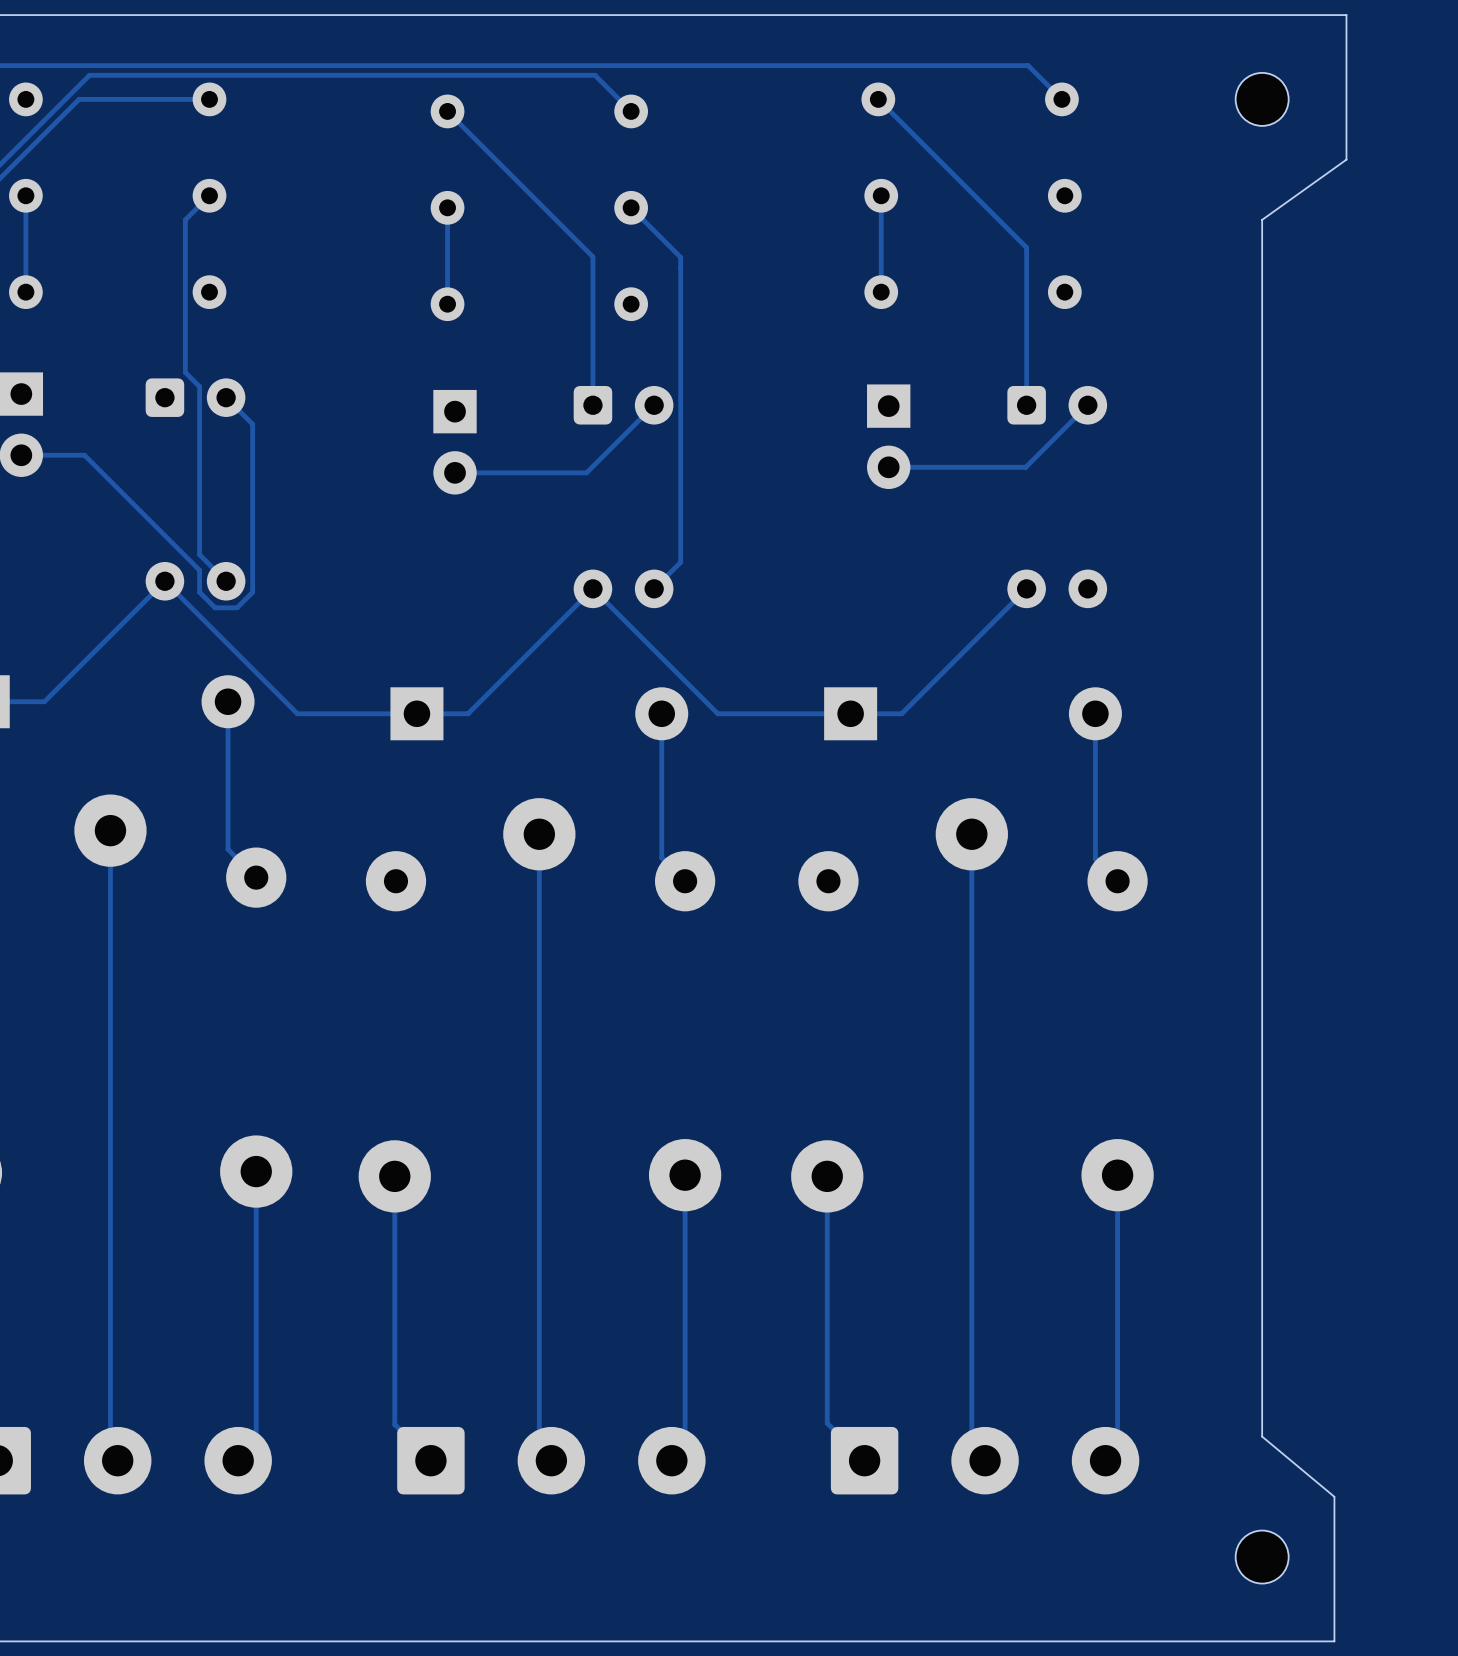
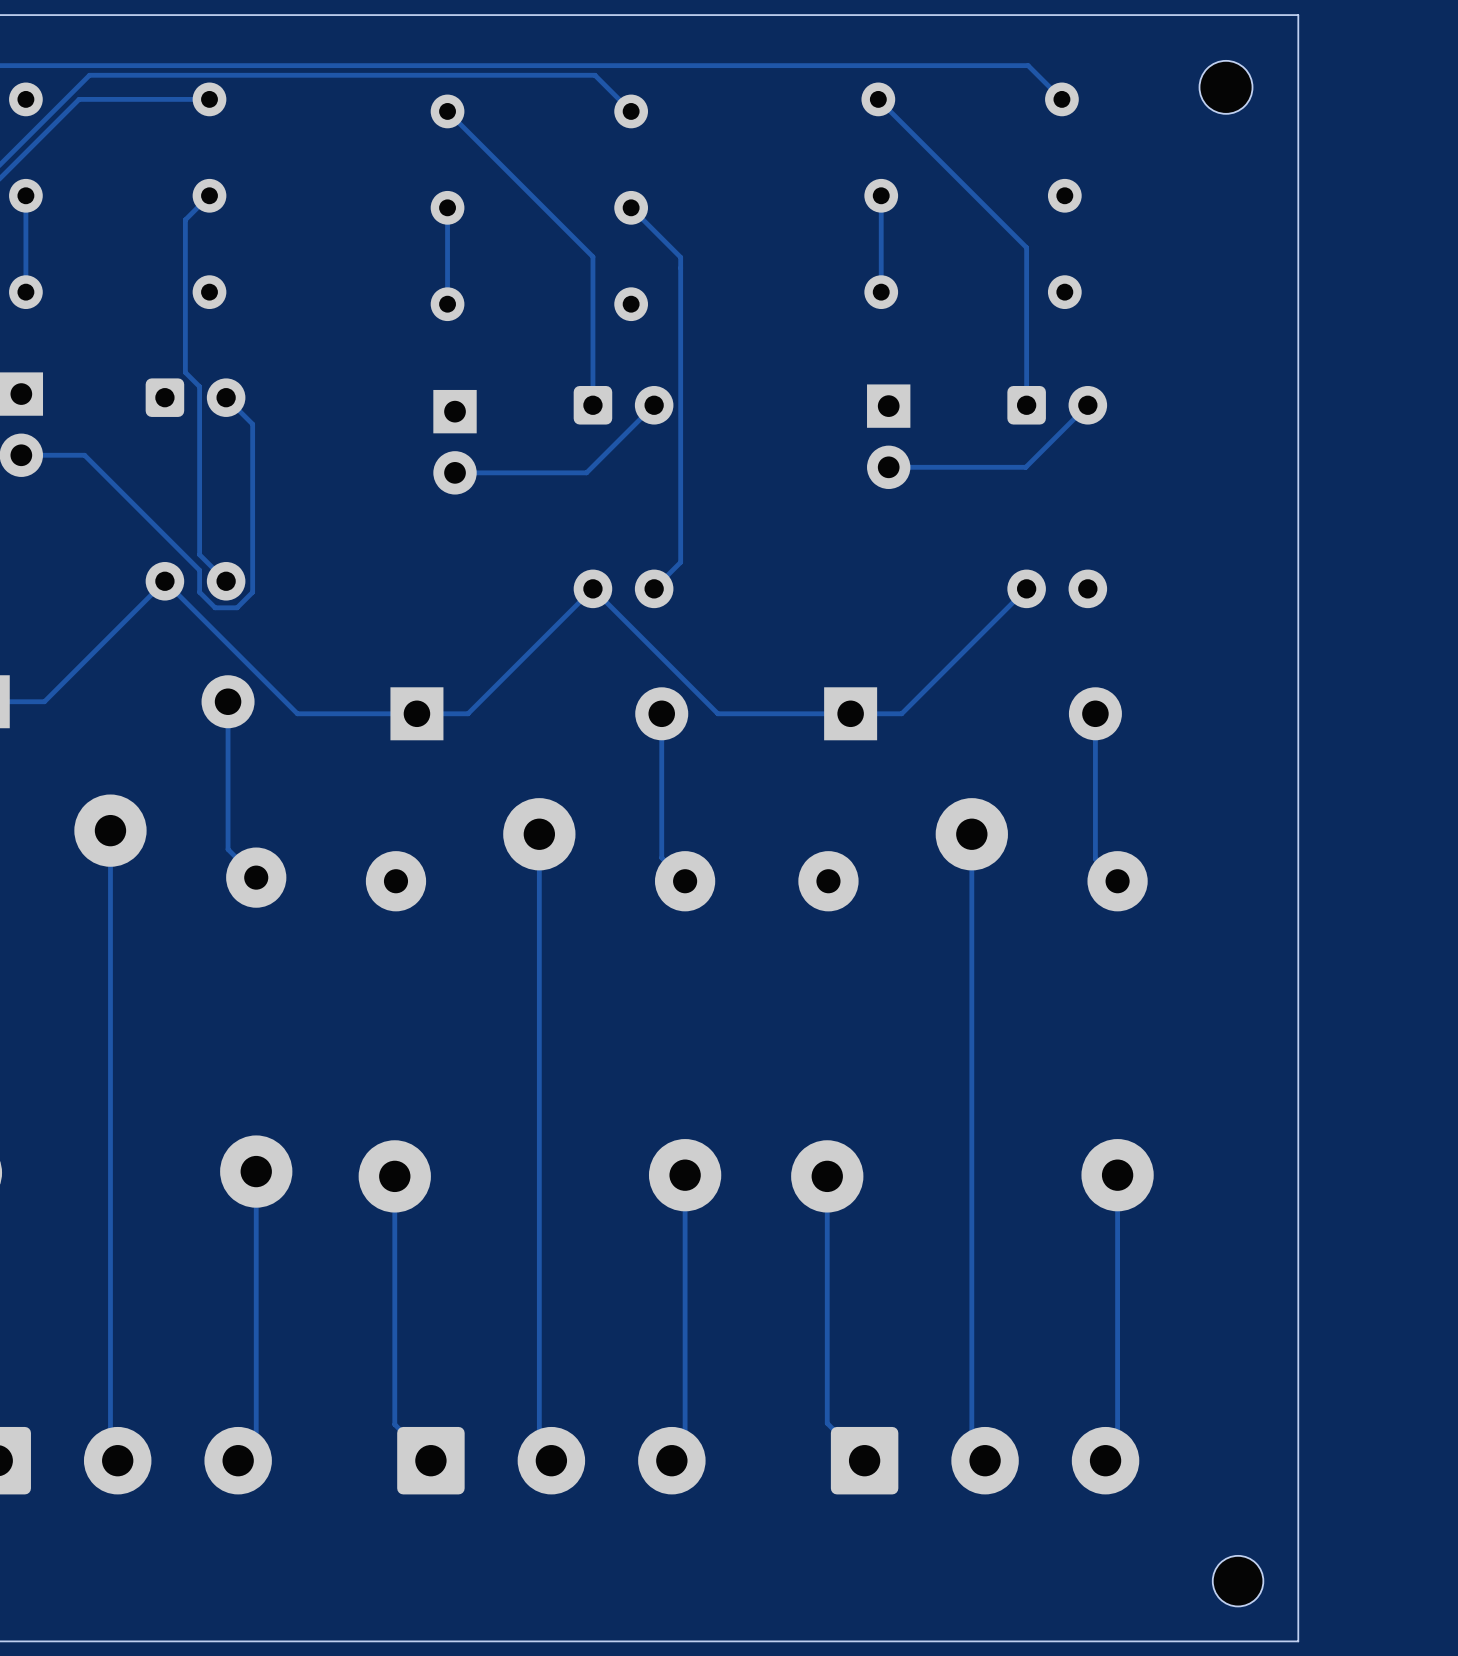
board edge: (1298, 15) (1346, 15) (1346, 159) (1262, 219) (1262, 1436) (1334, 1496) (1334, 1641) (1298, 1641) -> (1298, 15) (1298, 1641)
part position: (1262, 99) -> (1226, 87)
part: (1262, 1557) -> none
part: none -> (1238, 1581)

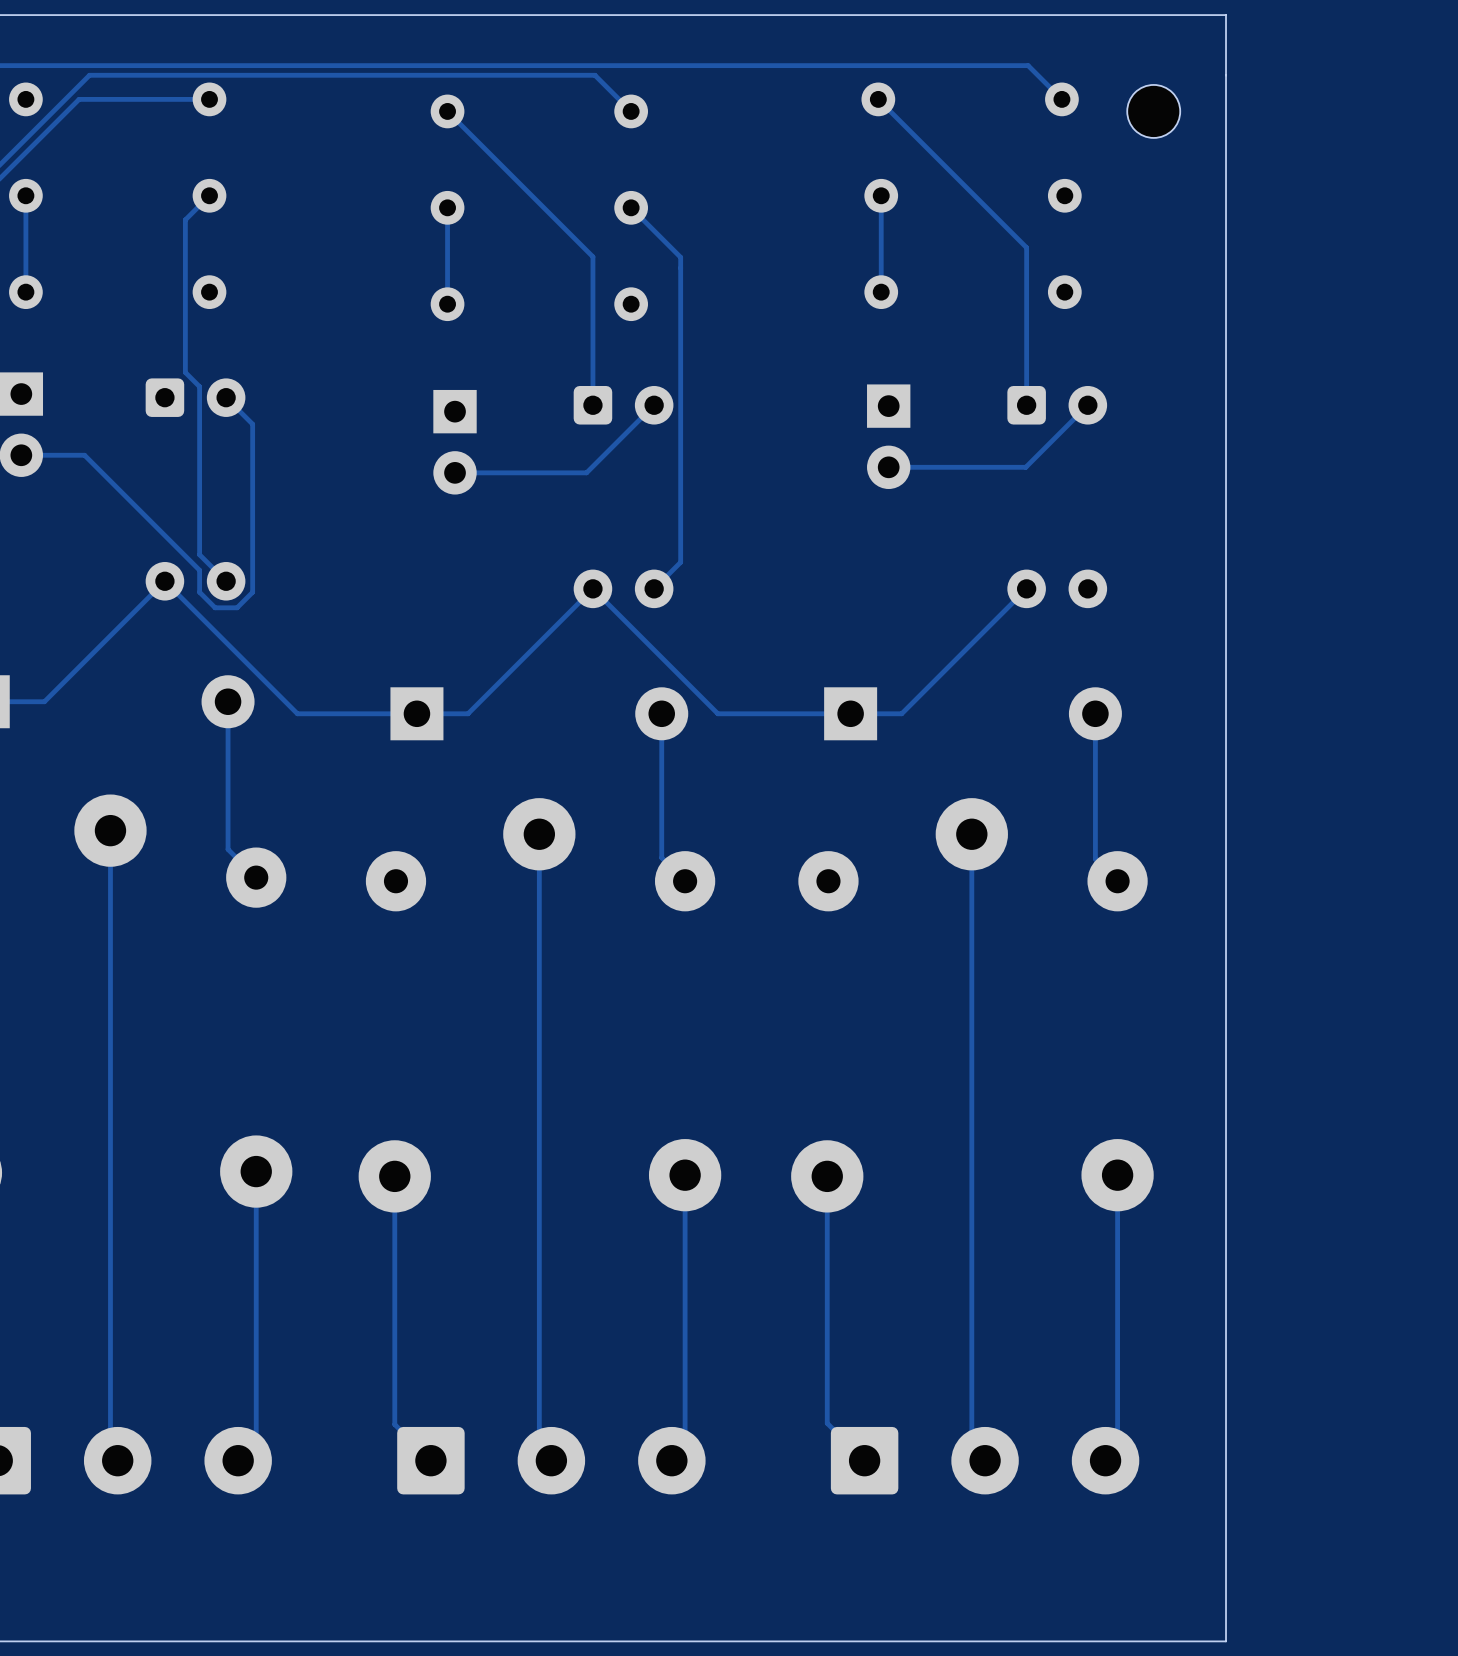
board edge: (1226, 15) (1298, 15) (1298, 1641) (1226, 1641) -> (1226, 15) (1226, 1641)
part position: (1226, 87) -> (1153, 111)
part: (1238, 1581) -> none

